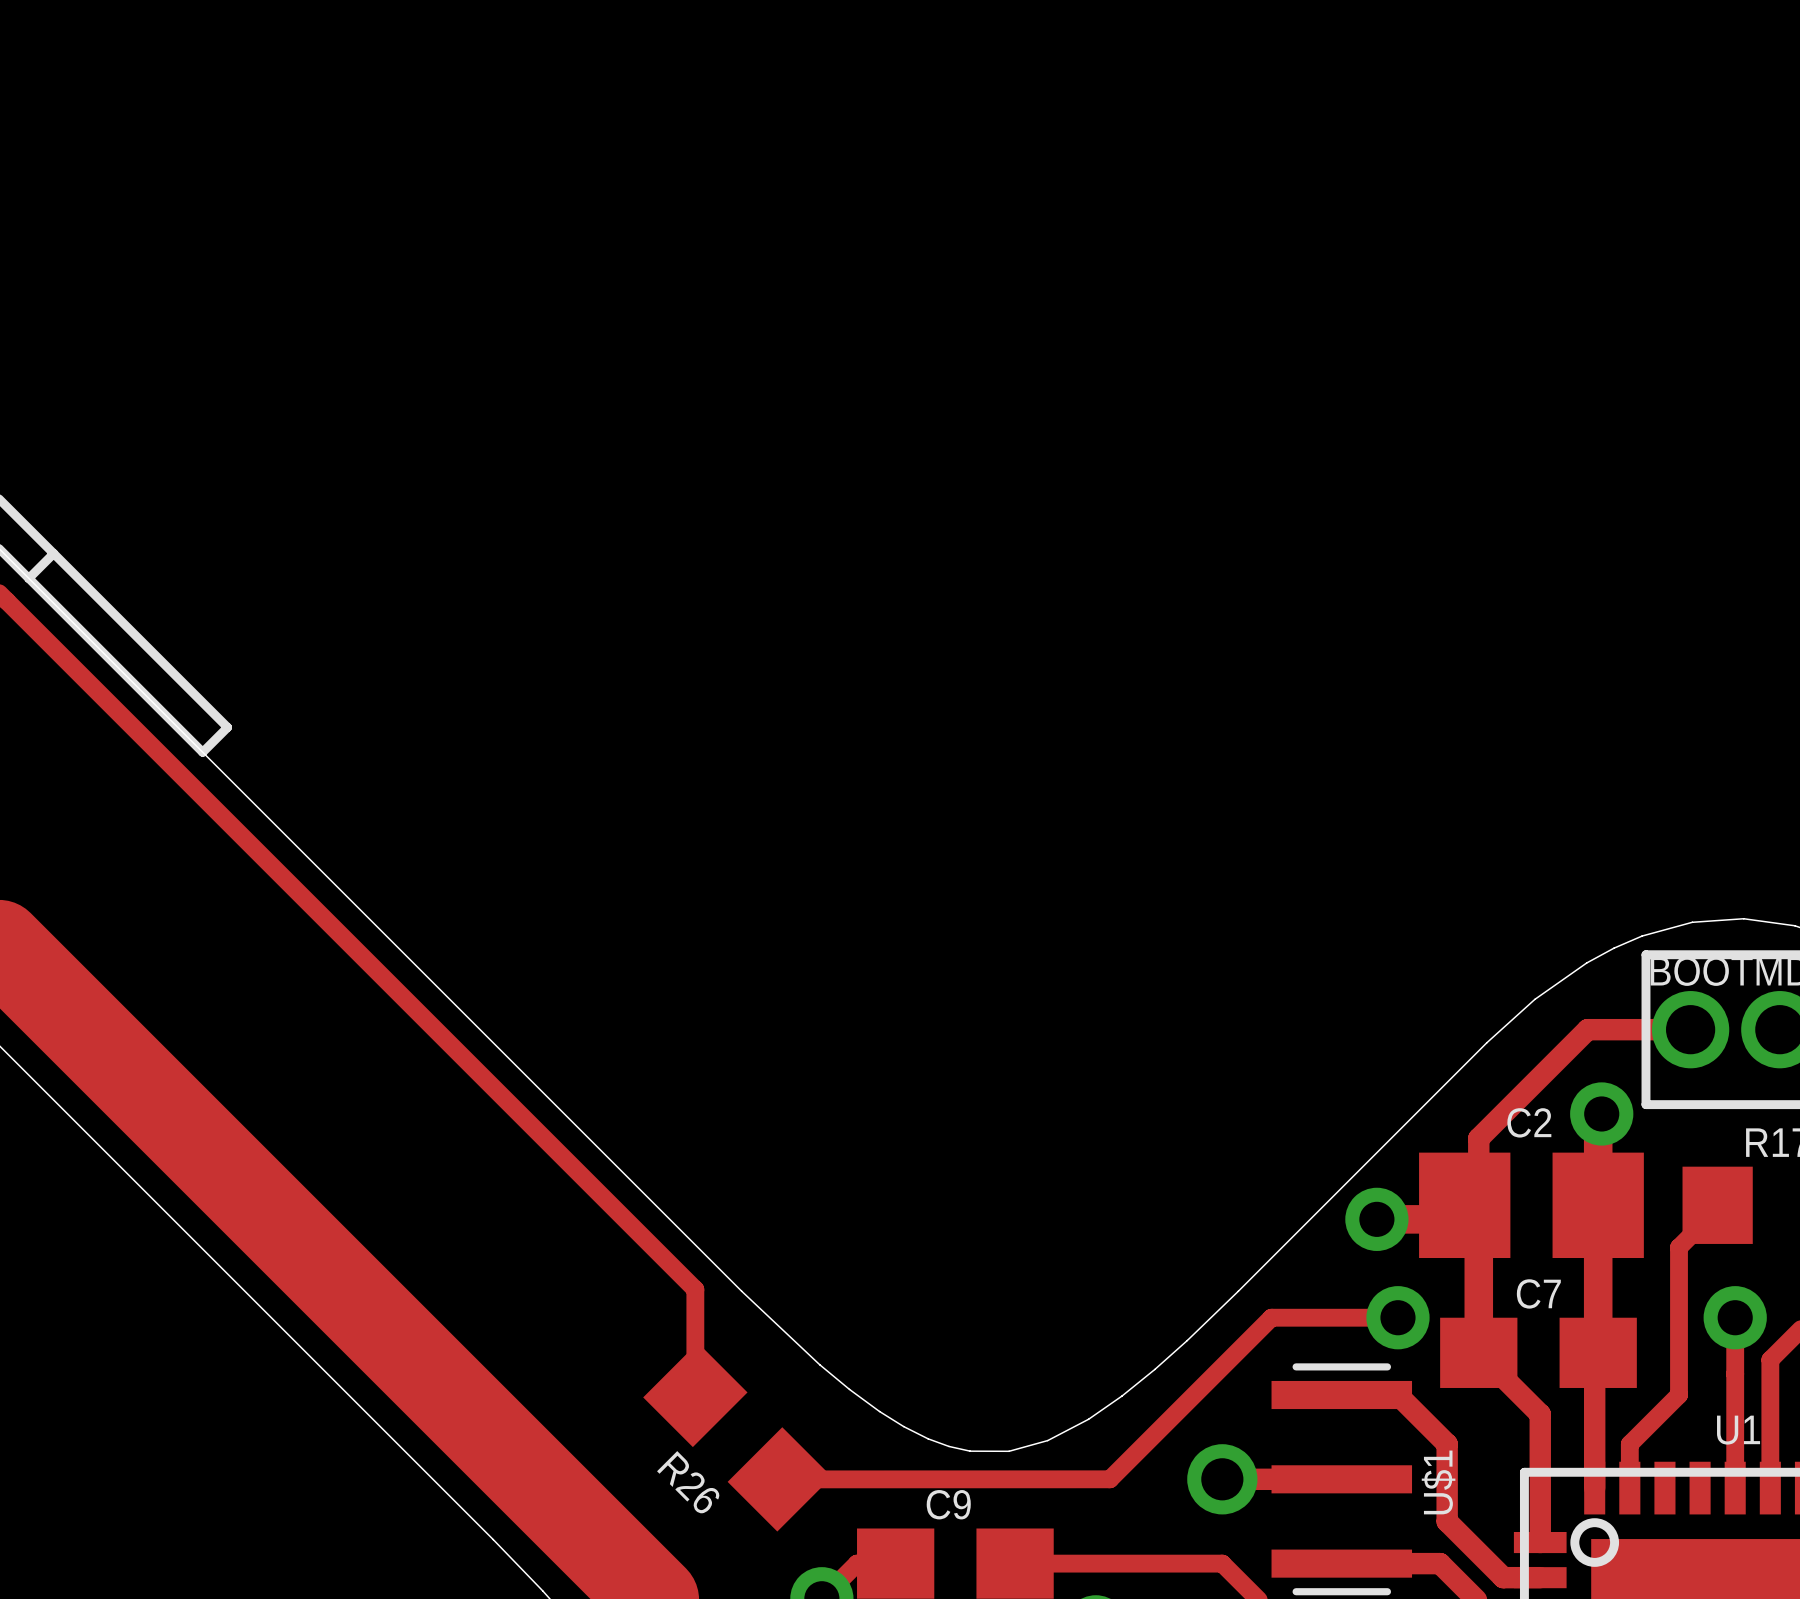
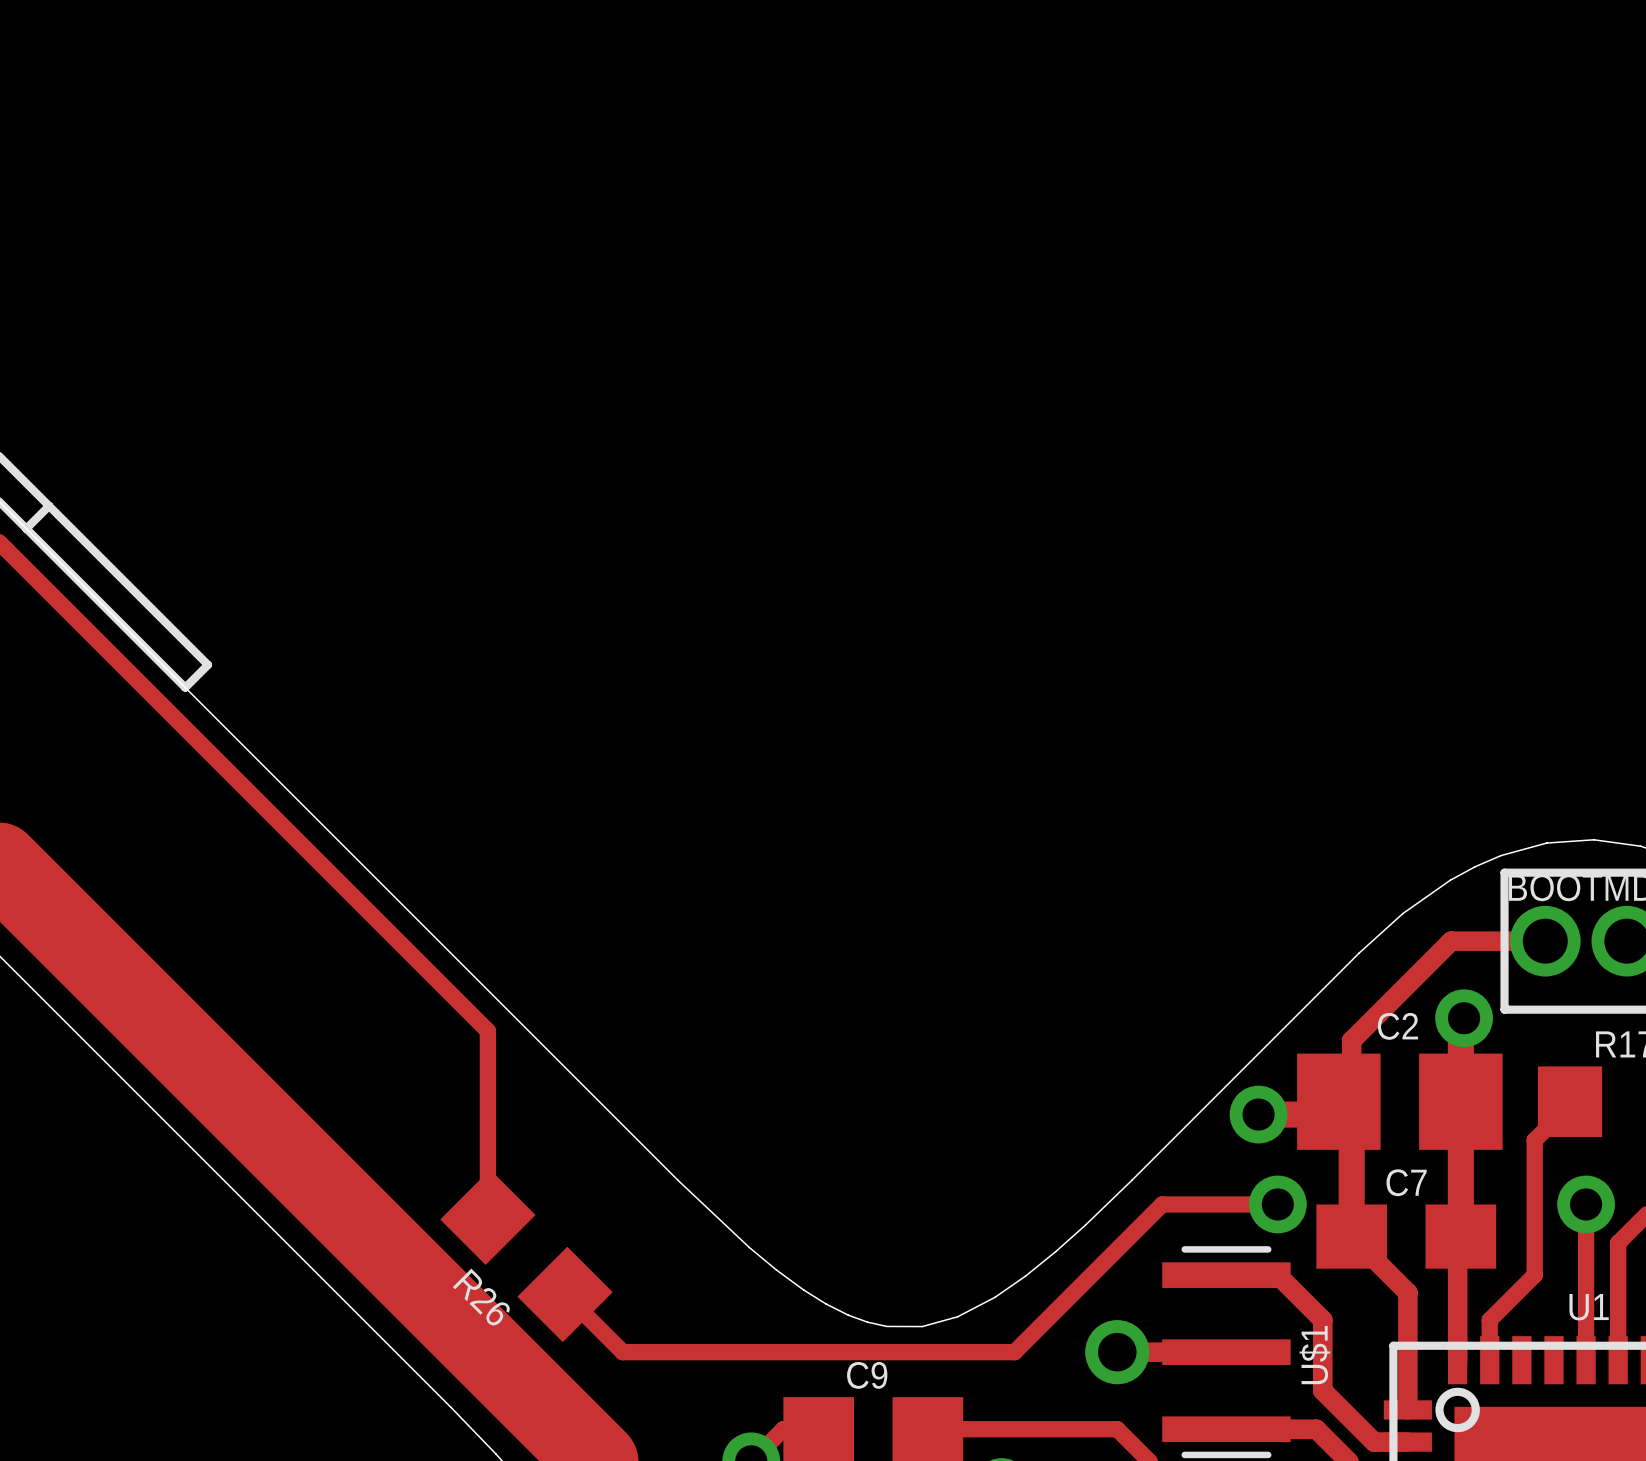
track: (533, 1127) (695, 1289) (695, 1394) -> (487, 1031) (487, 1217)
R26 position: (737, 1437) -> (526, 1255)
track: (779, 1479) (1109, 1479) -> (565, 1294) (622, 1352) (1014, 1352)

